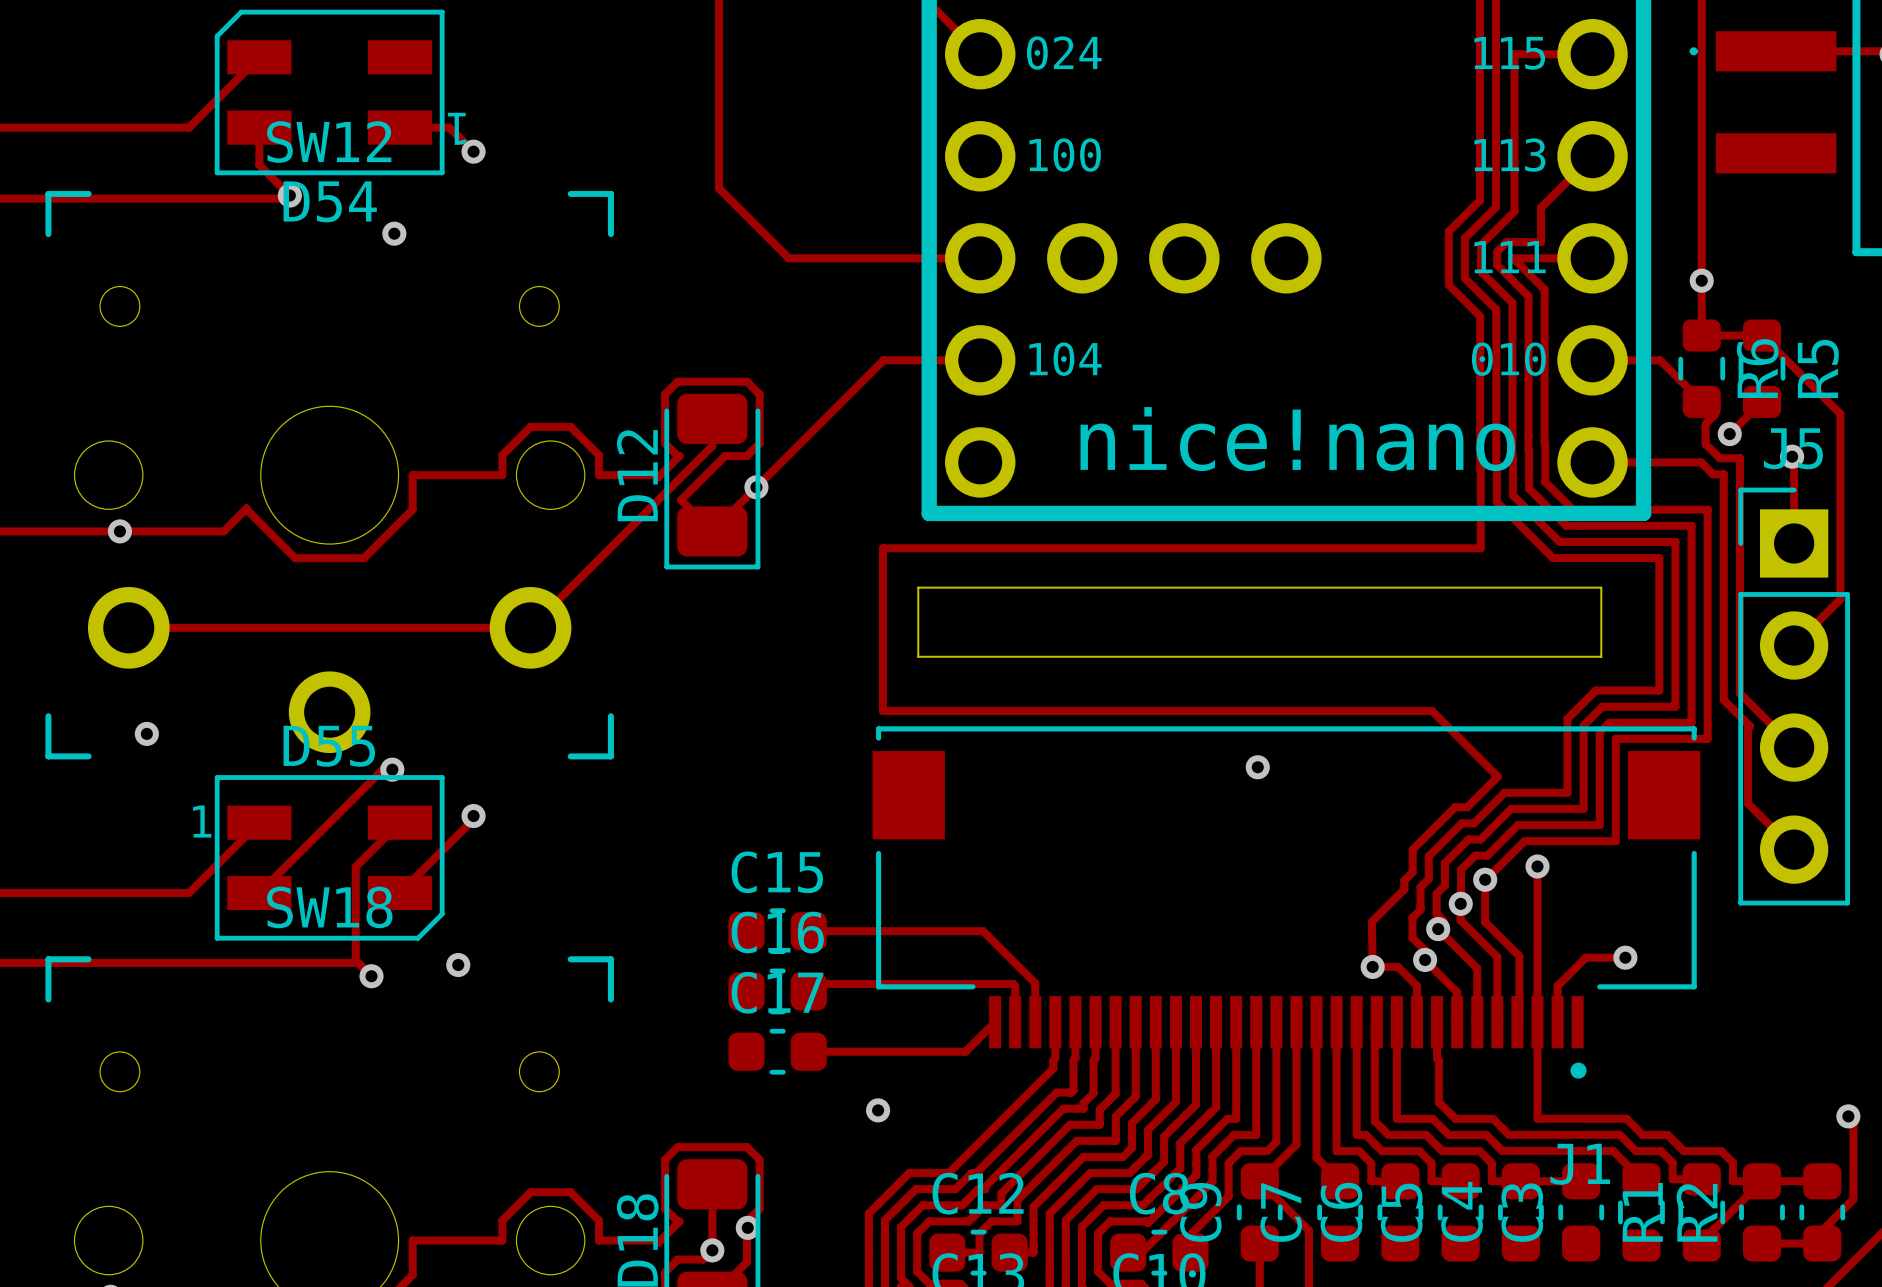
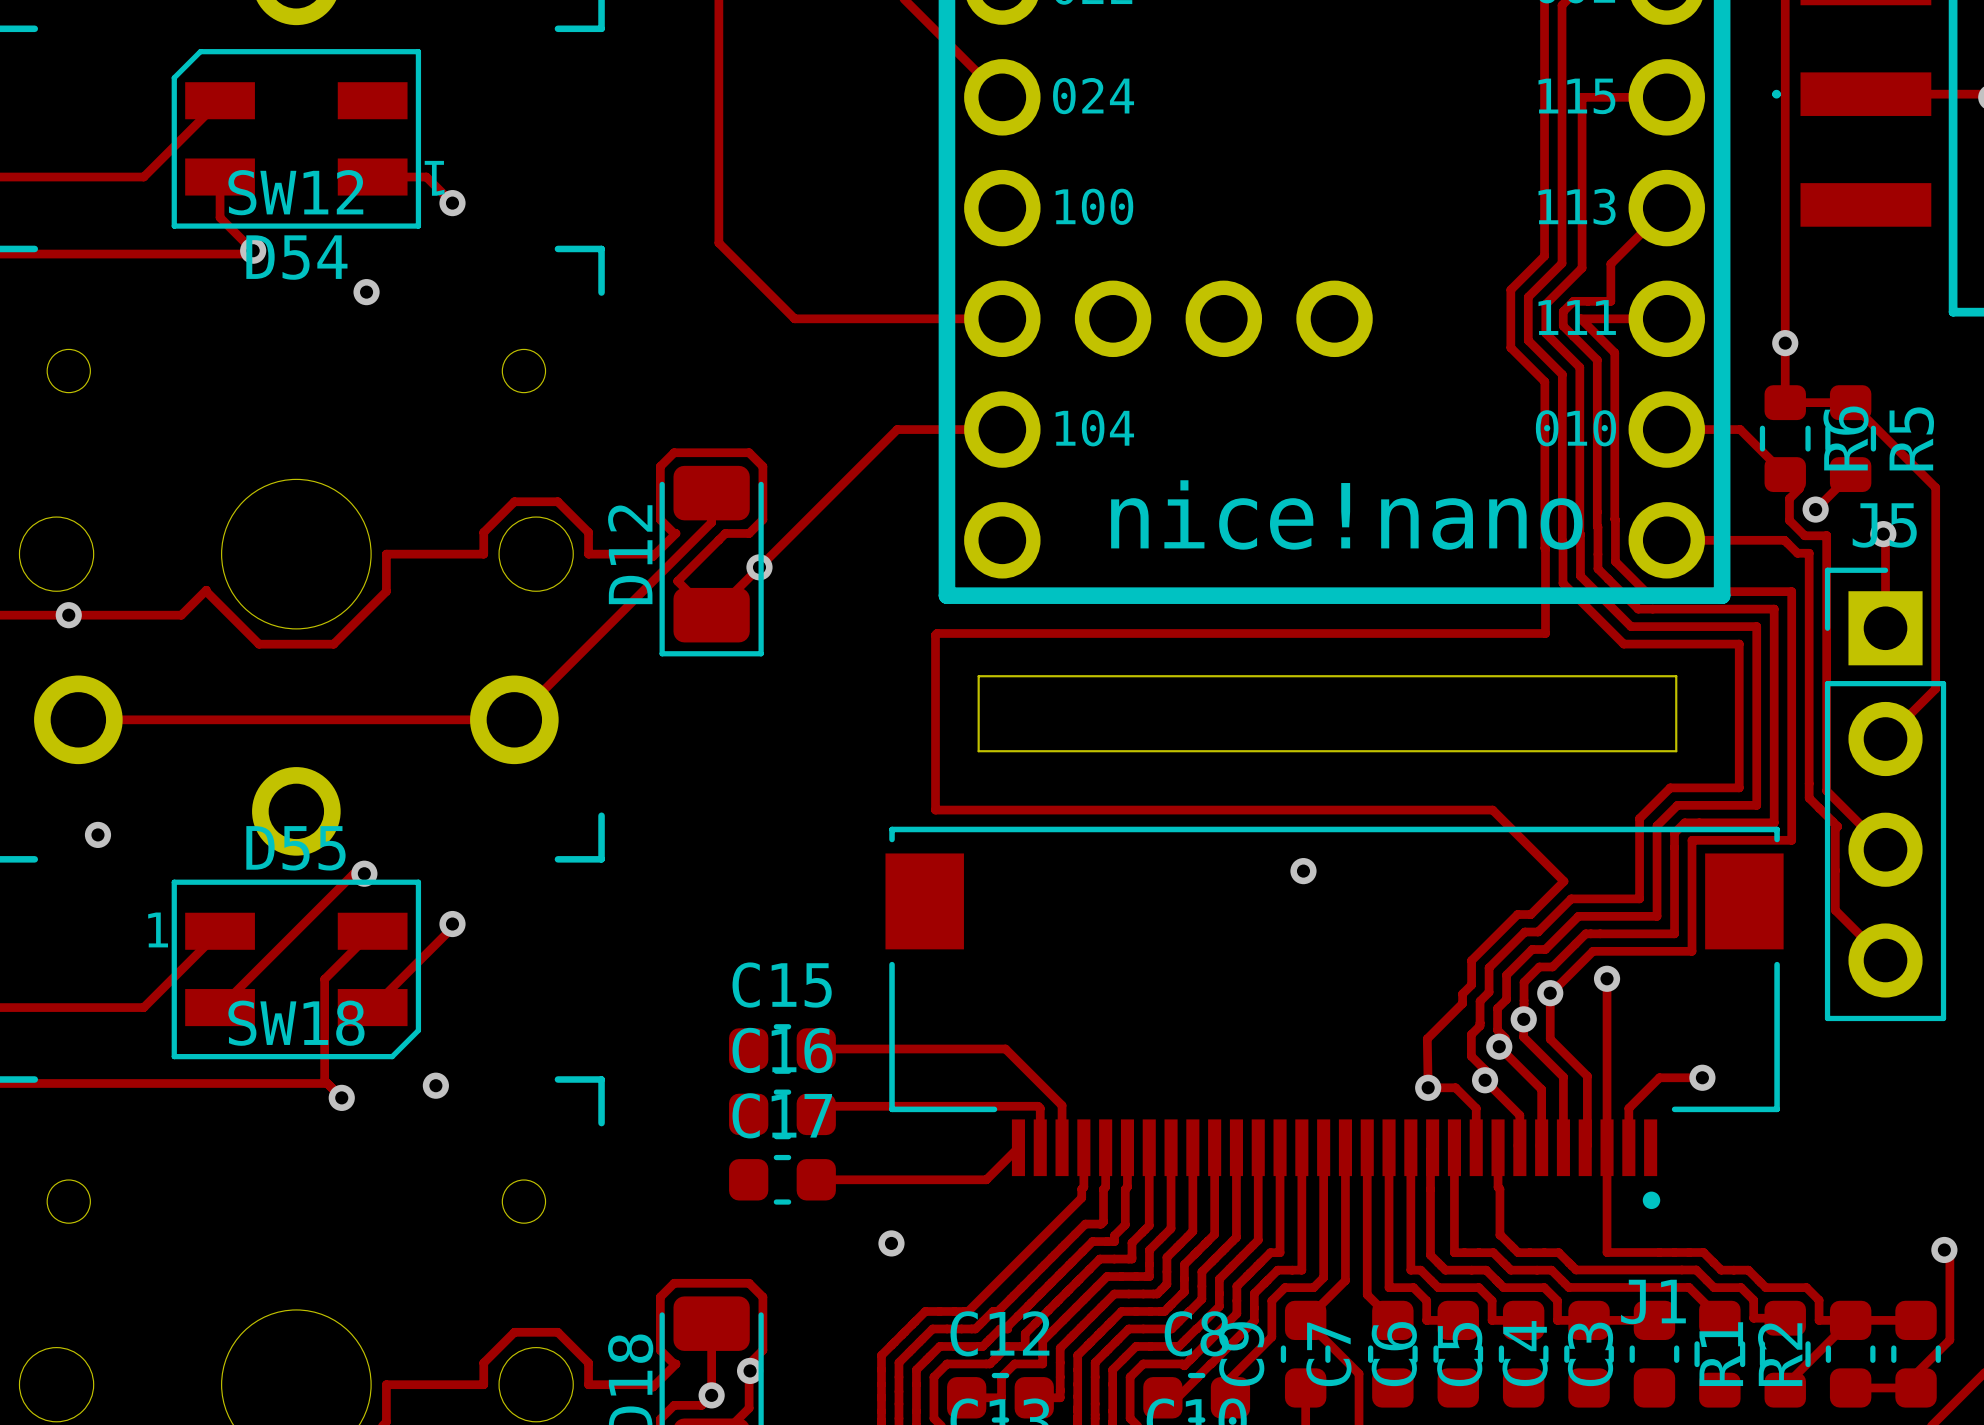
track: (920, 548) (882, 548) (882, 711) (918, 711) -> (937, 633) (935, 635) (935, 810)
board edge: (958, 587) (918, 587) (918, 656) (958, 656) -> (978, 676) (978, 751)

